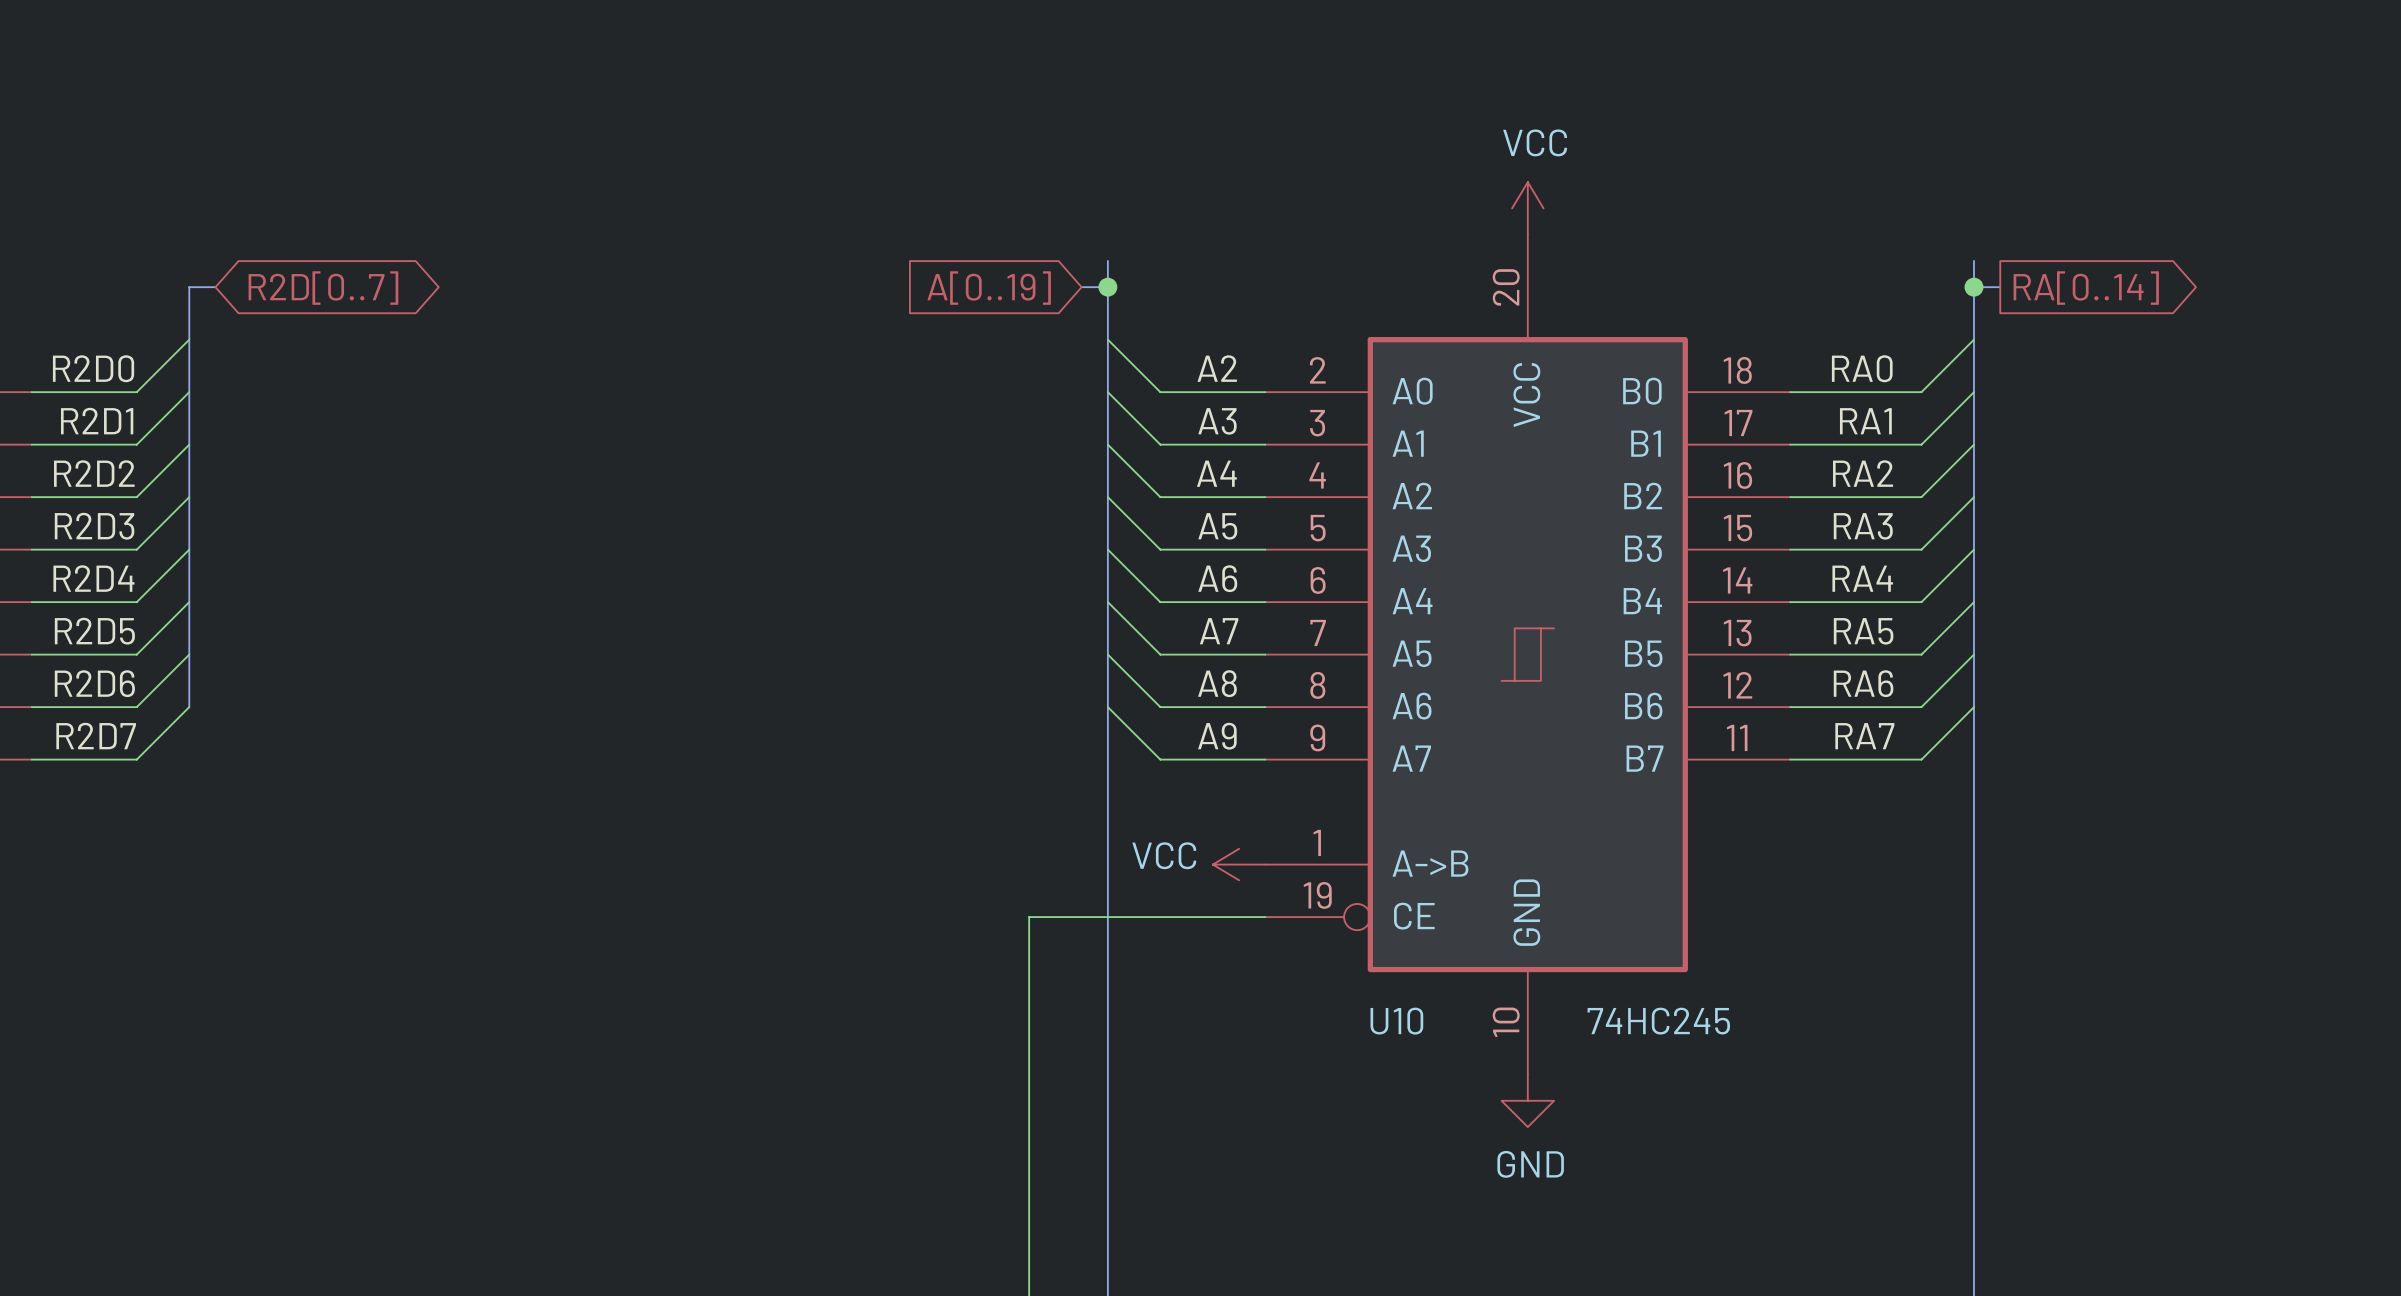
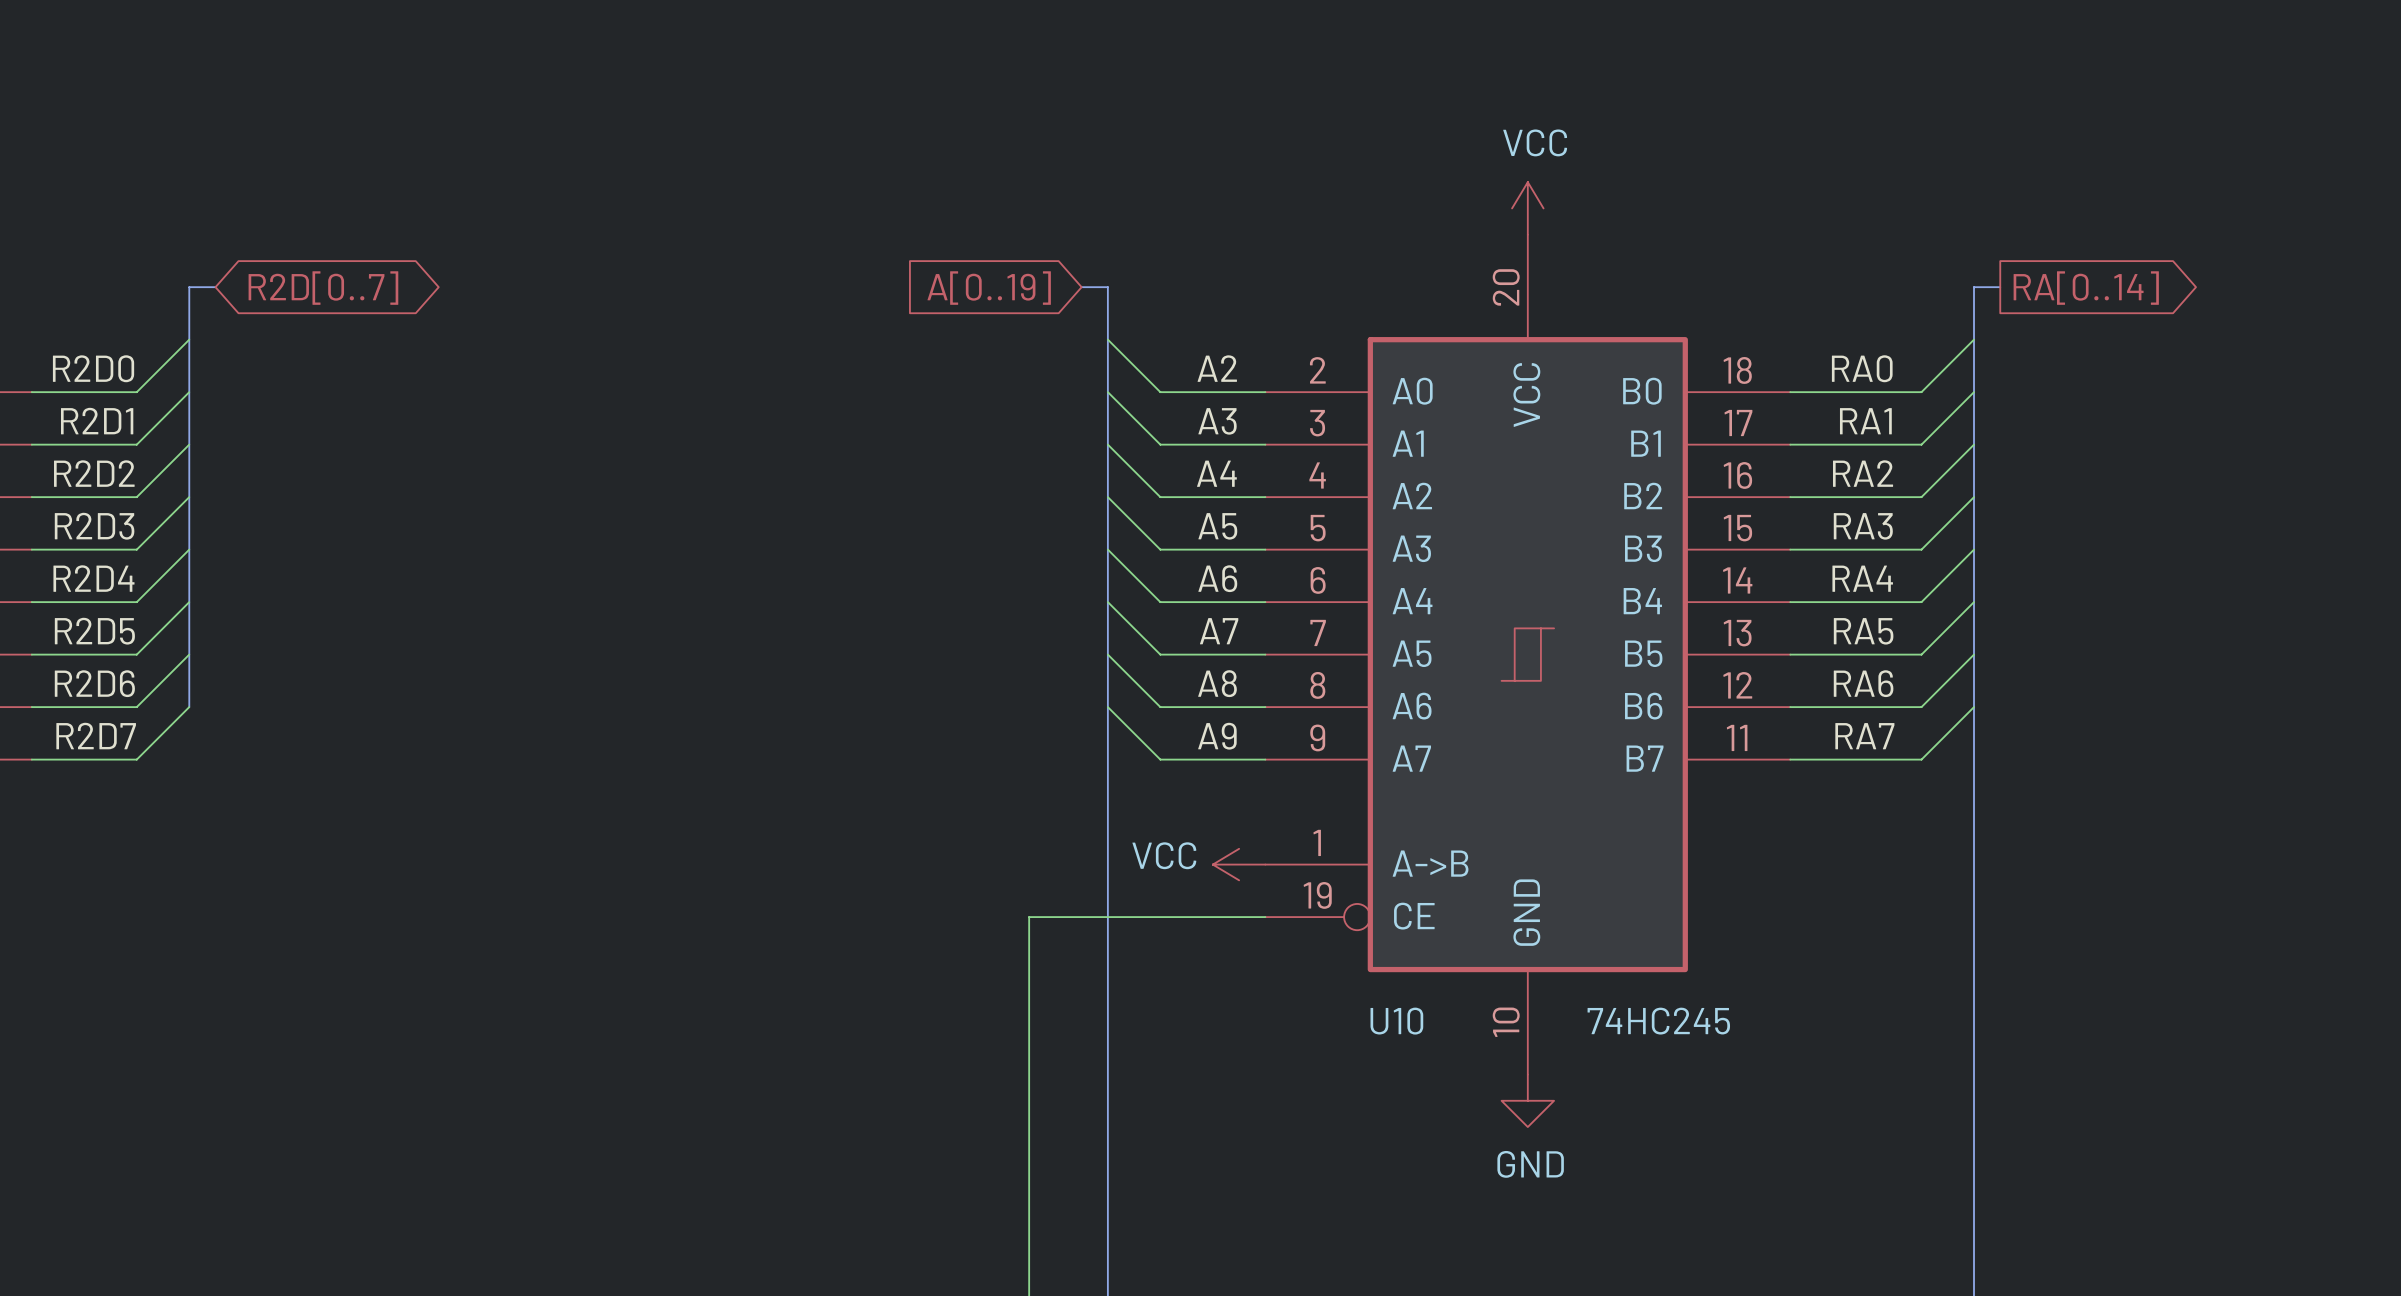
bus: (1107, 260) (1107, 287) -> none
bus: (1974, 260) (1974, 287) -> none
junction: (1107, 287) -> none
junction: (1974, 287) -> none

